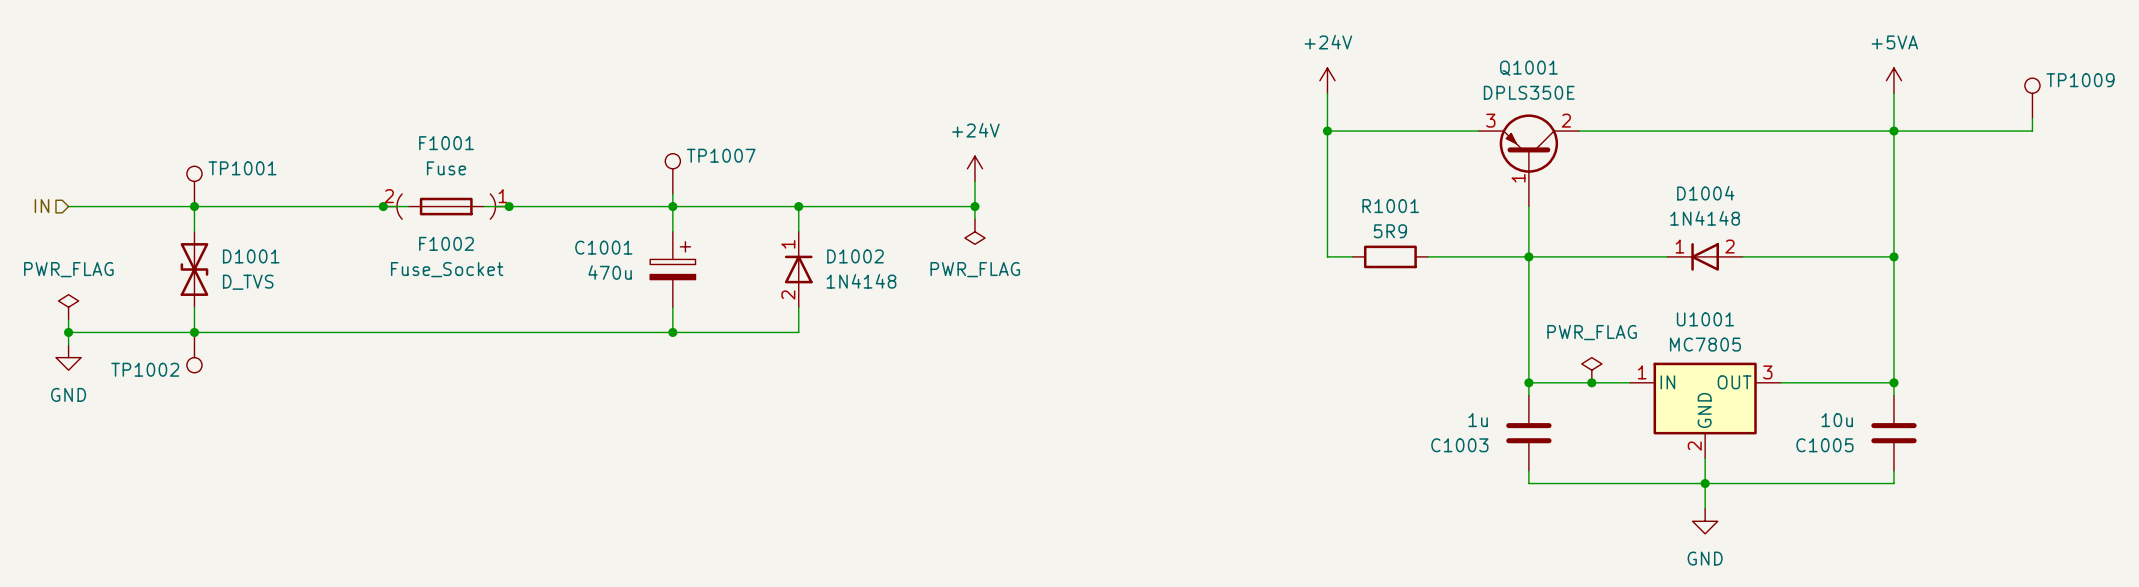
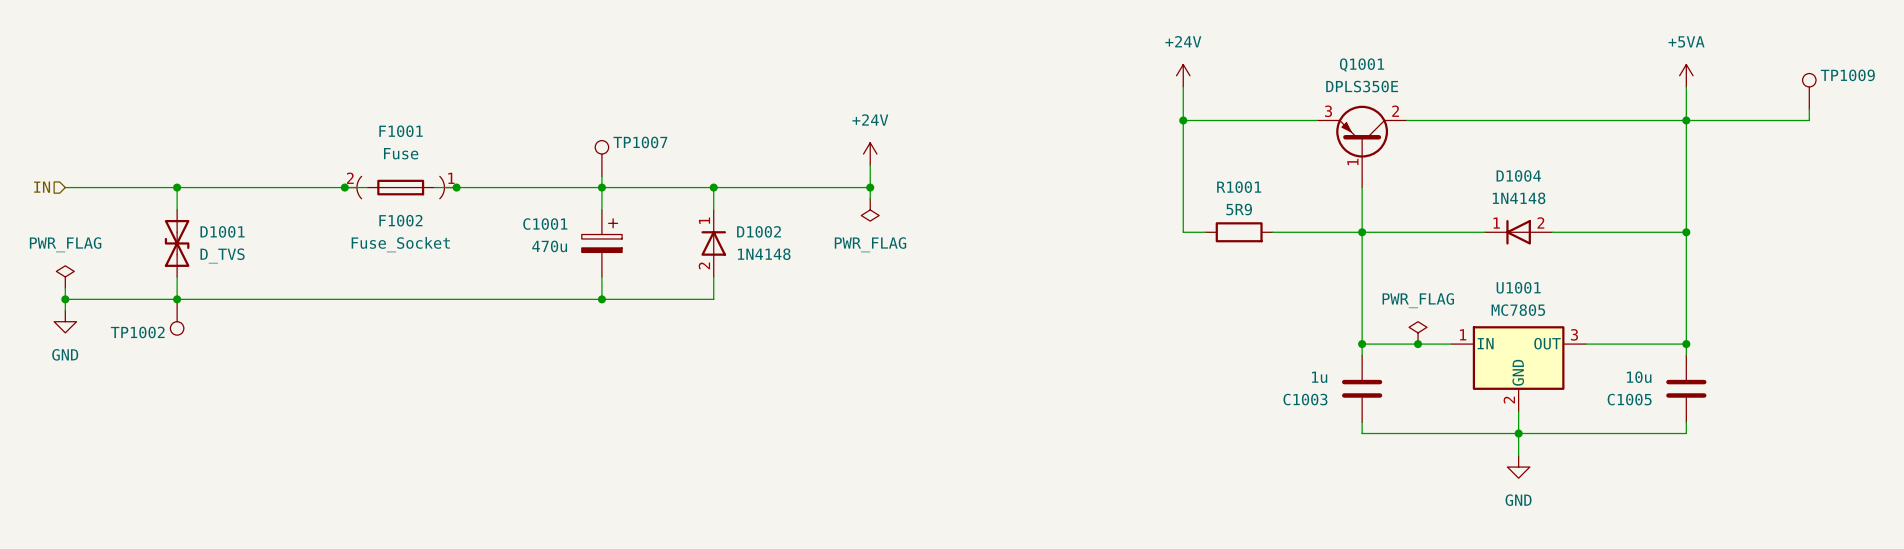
TP1001: (194, 186) -> none

